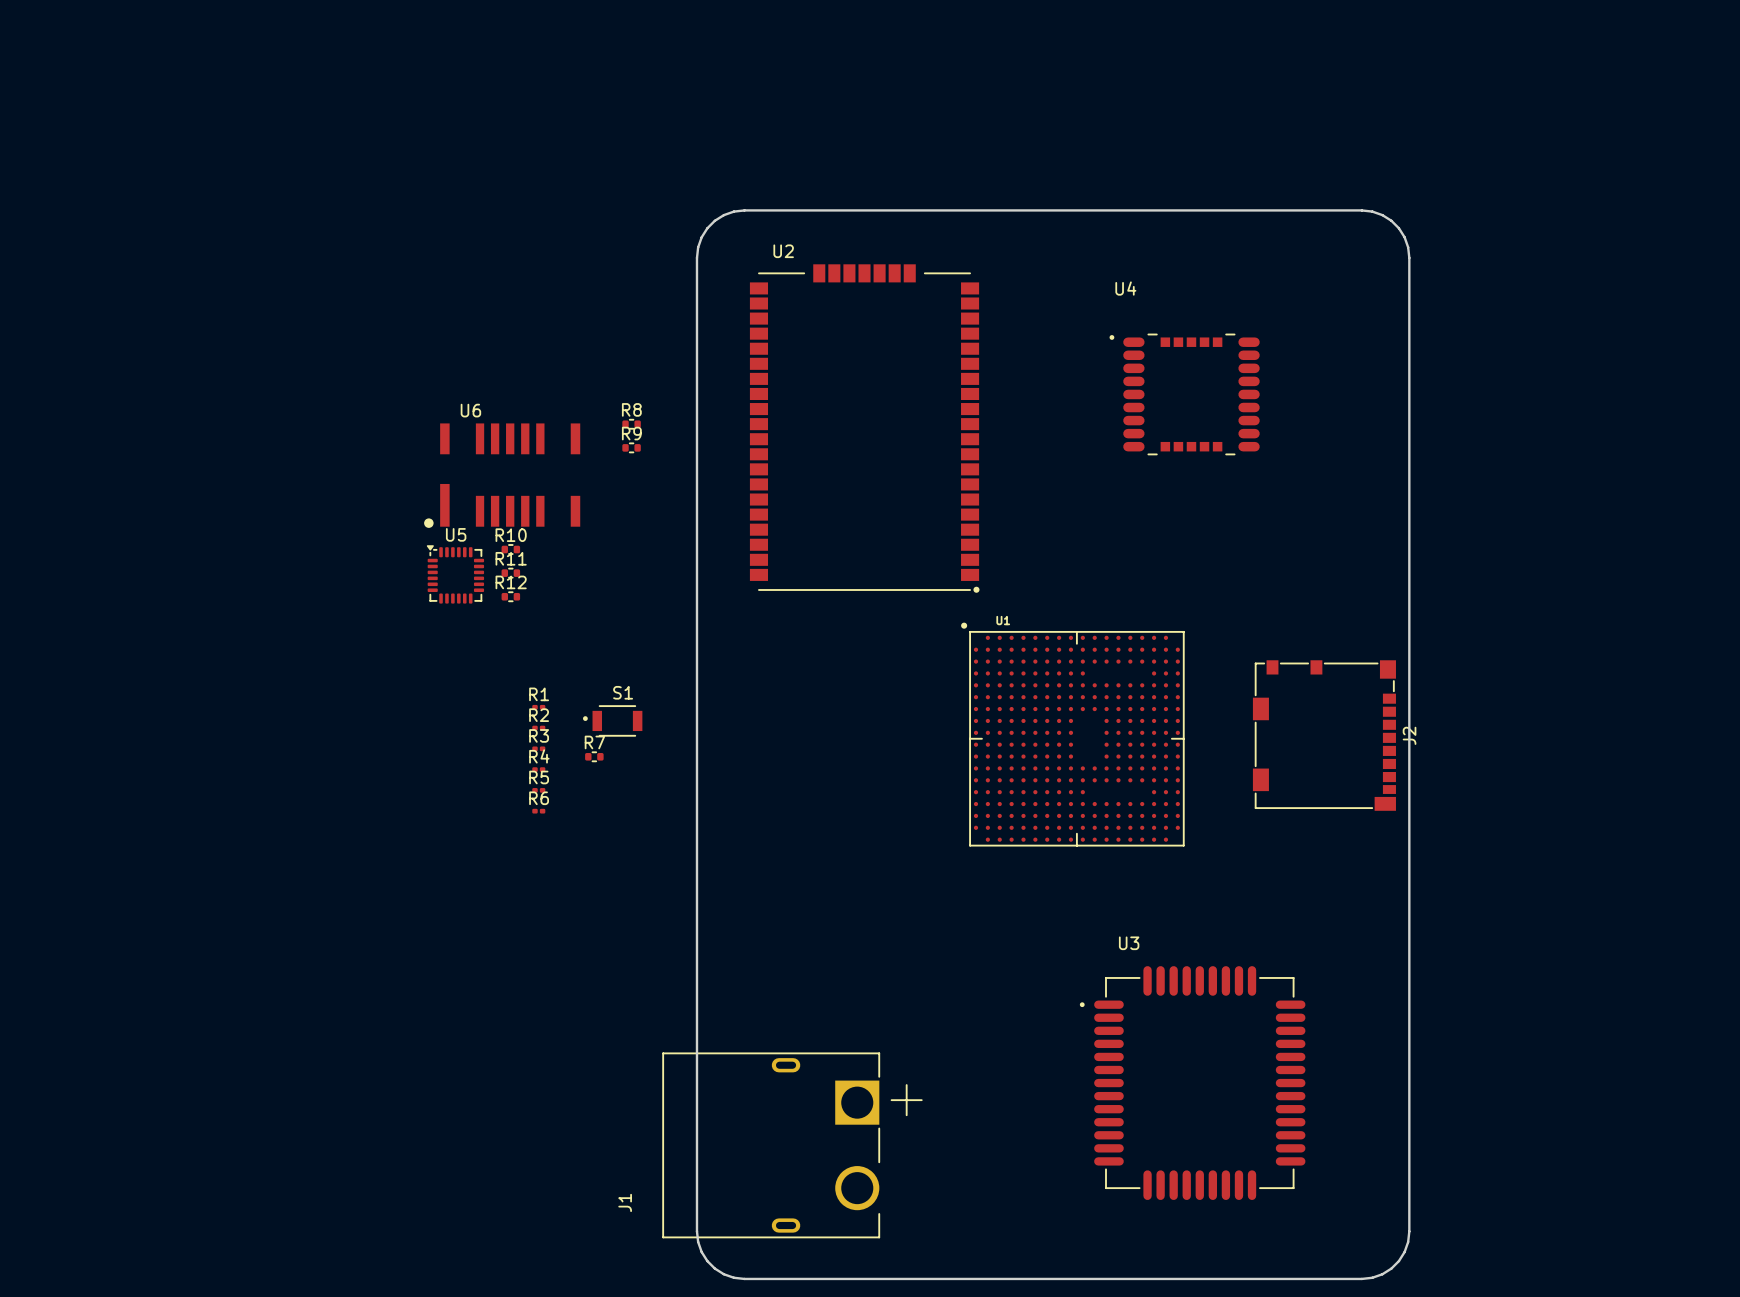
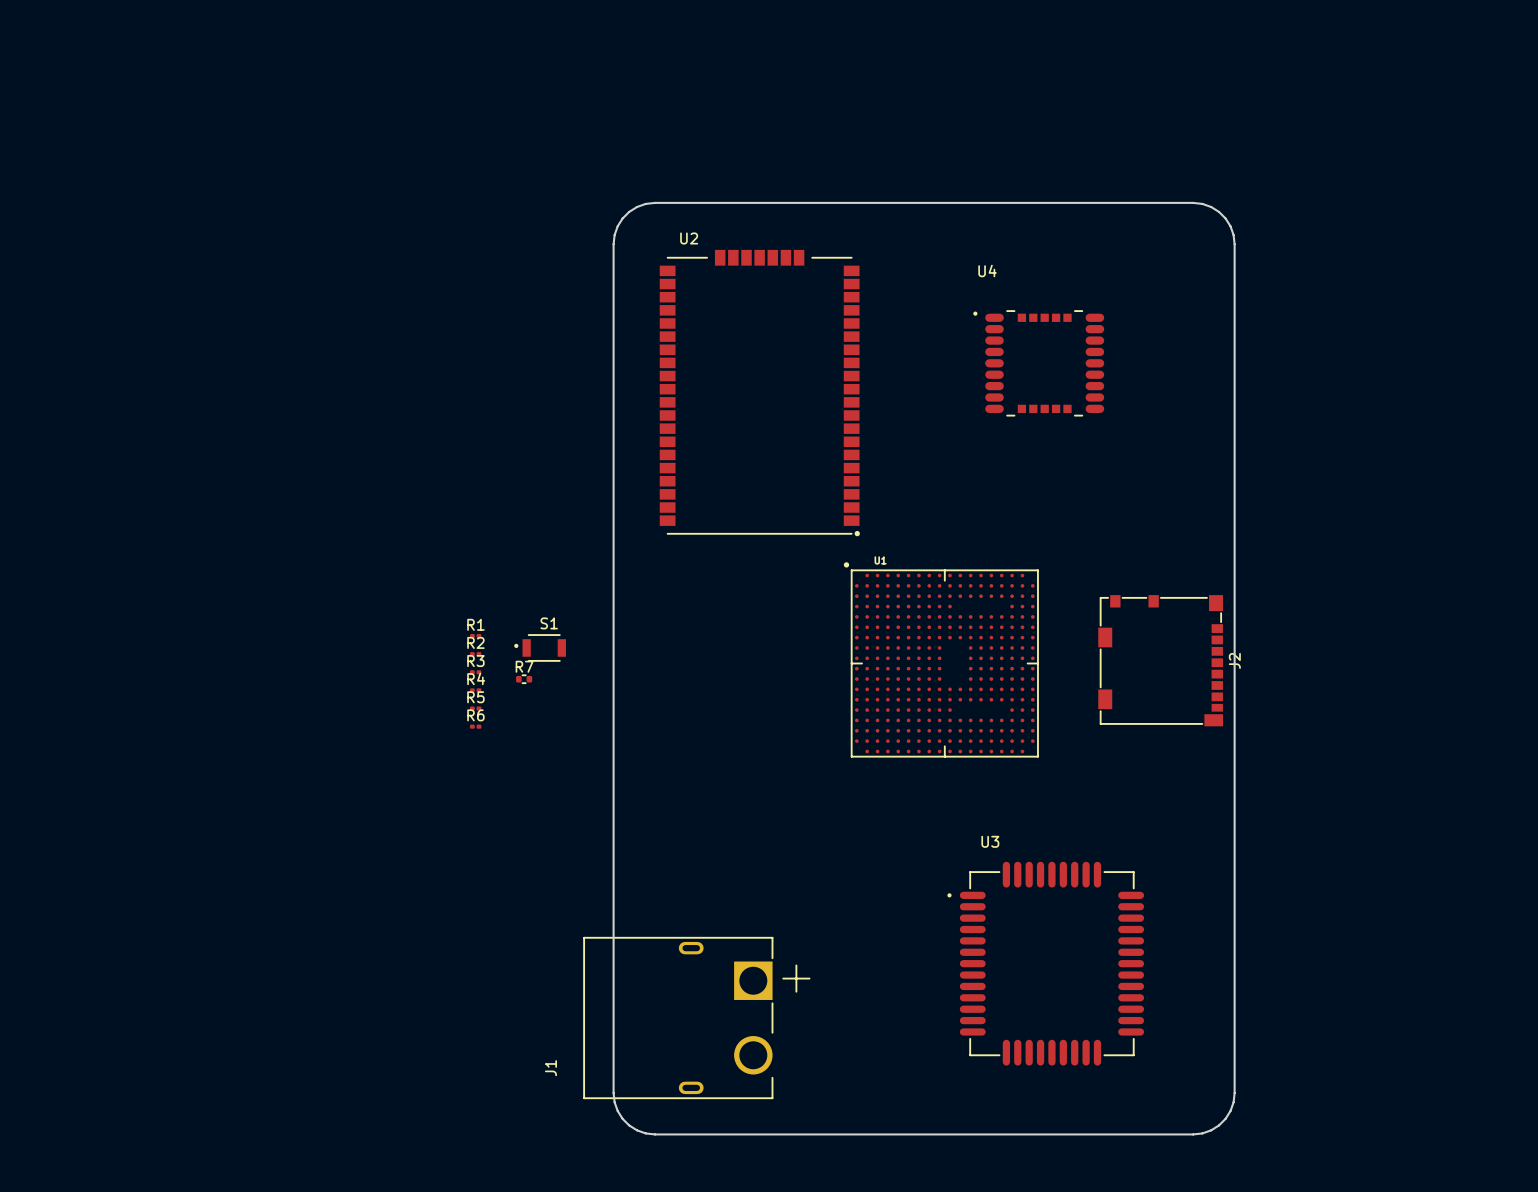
R8: (631, 424) -> none
R9: (631, 447) -> none
U6: (502, 475) -> none
R10: (510, 549) -> none
R11: (510, 573) -> none
U5: (455, 574) -> none
R12: (510, 596) -> none

